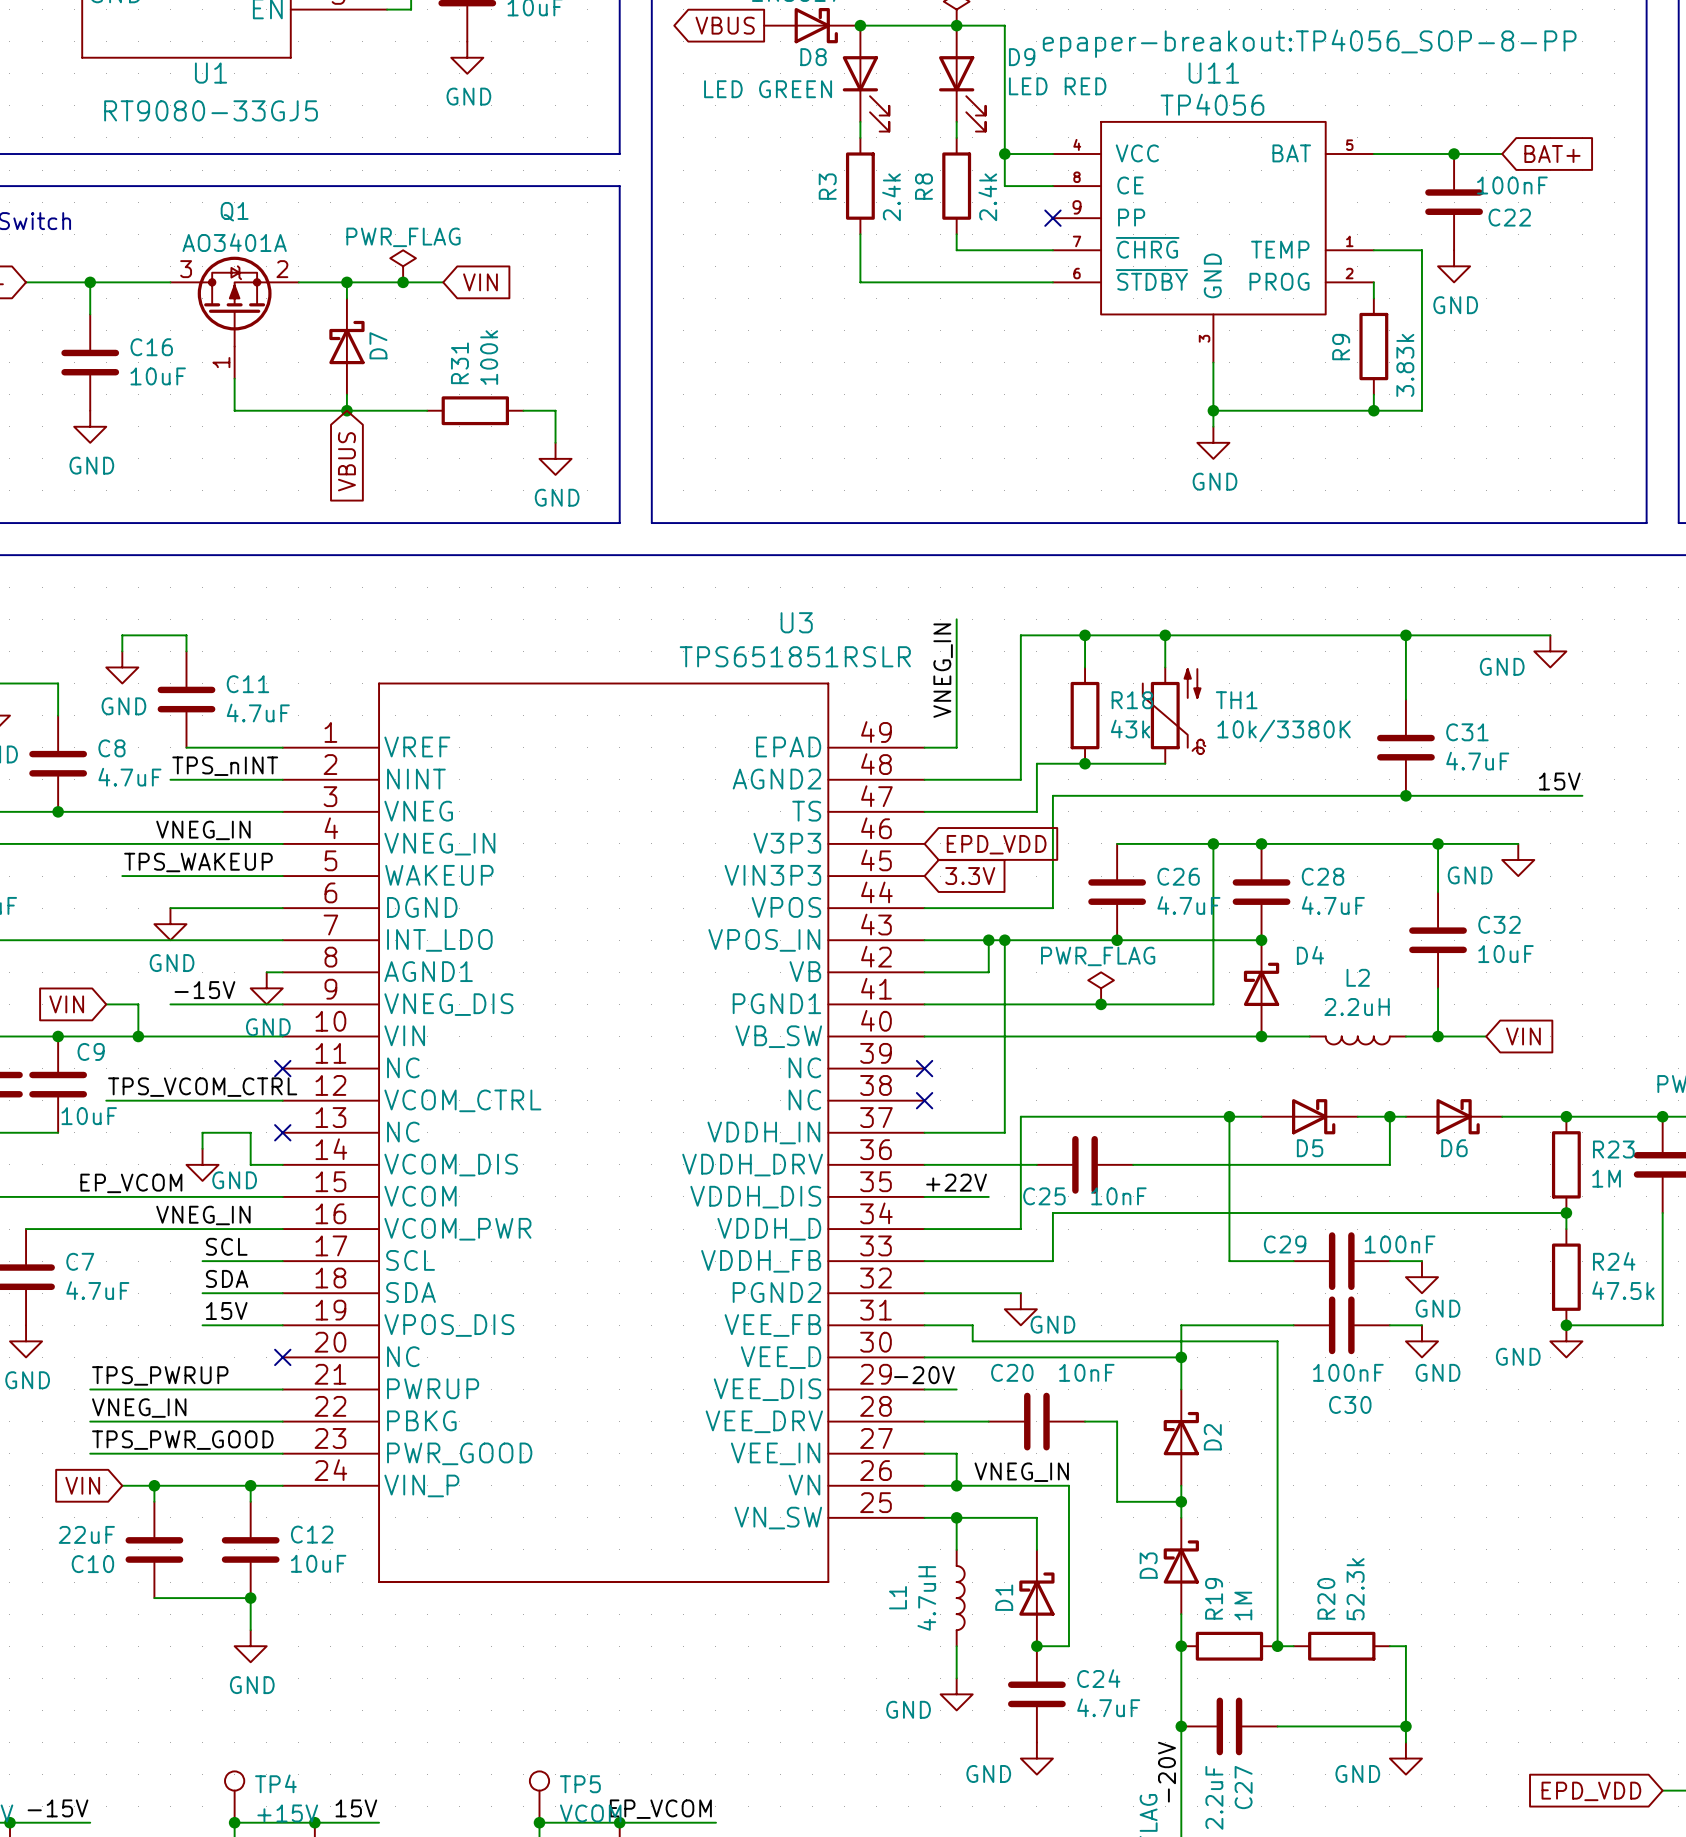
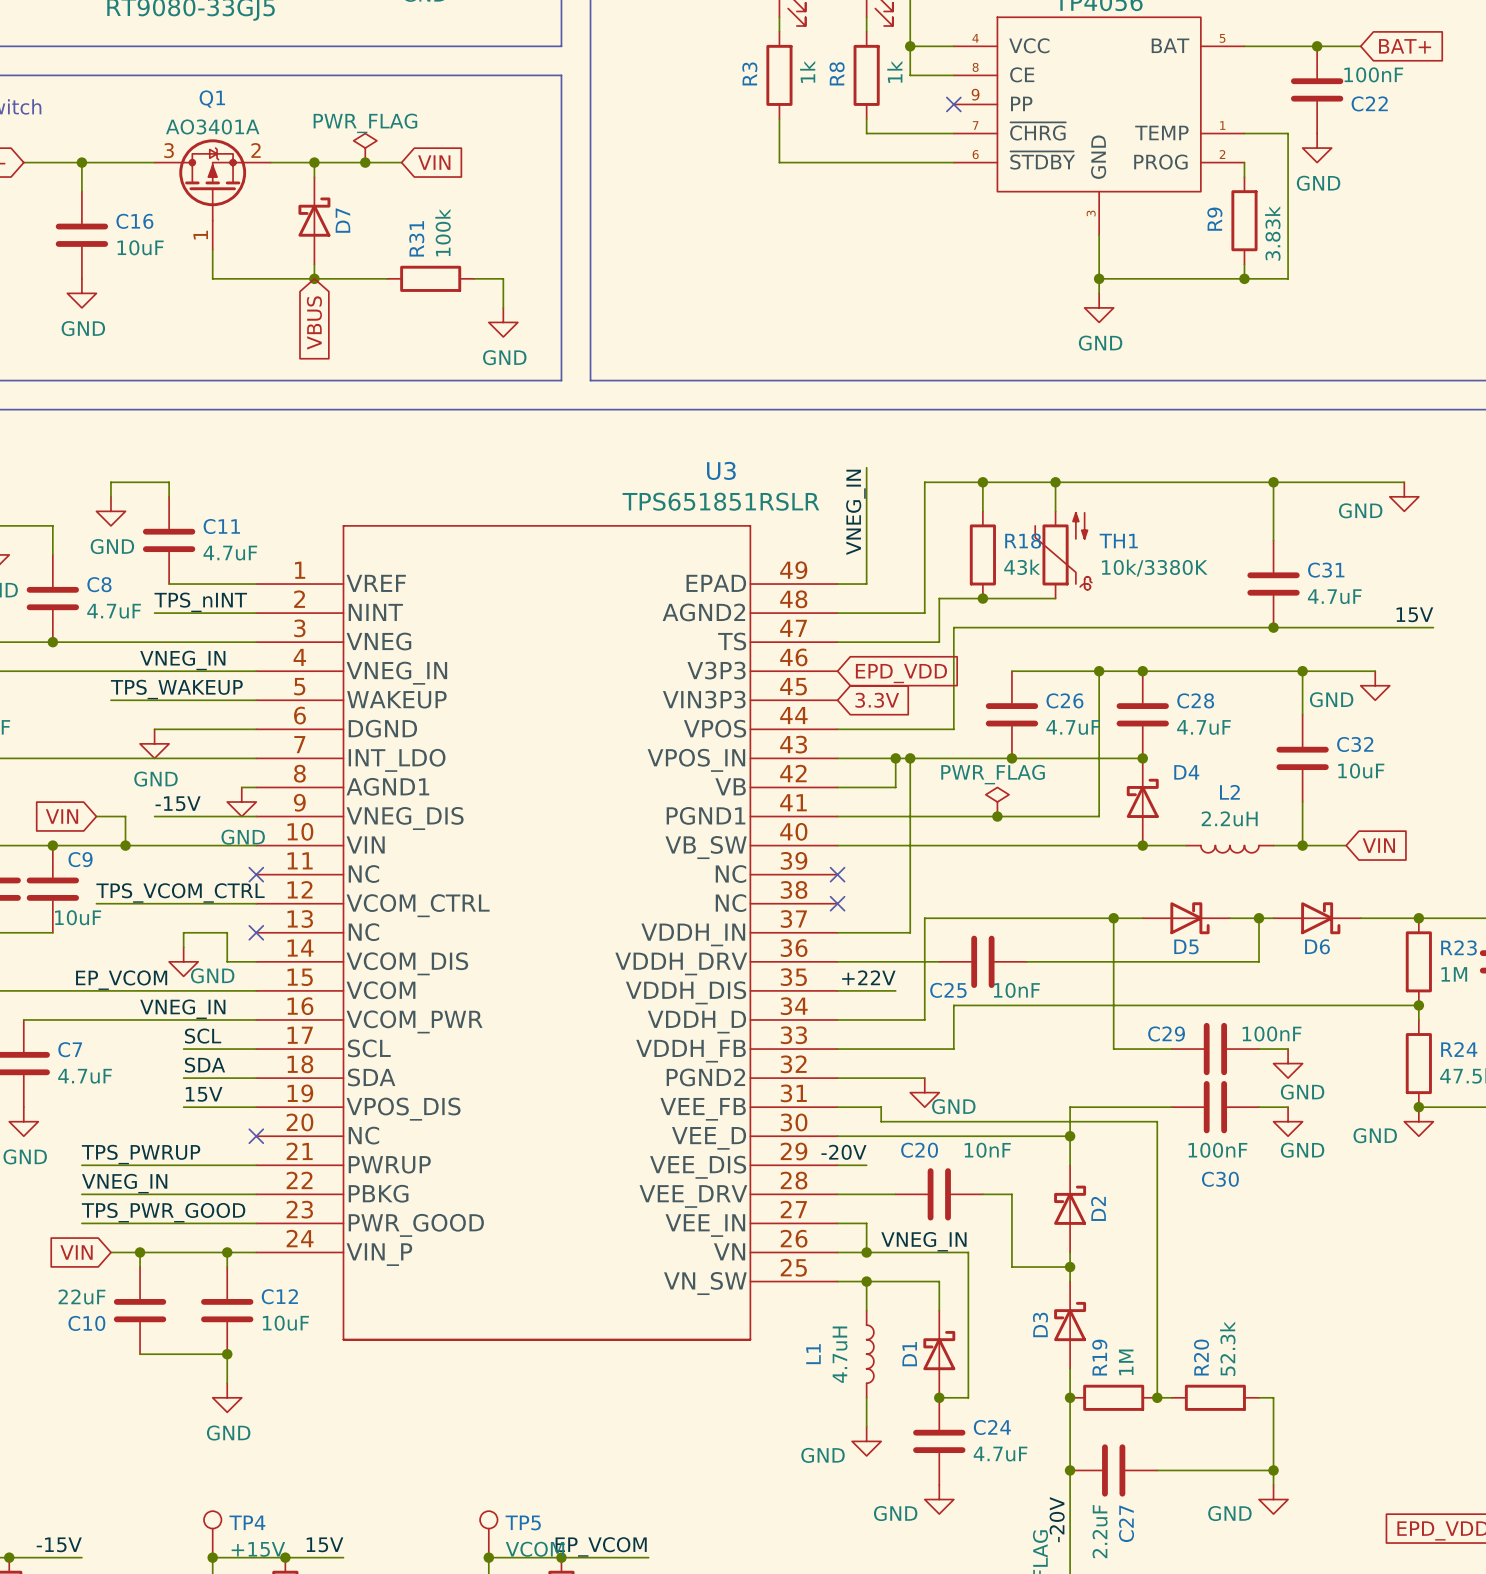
R3 value: 2.4k (891, 197) -> 1k (807, 71)
R8 value: 2.4k (987, 197) -> 1k (894, 71)

